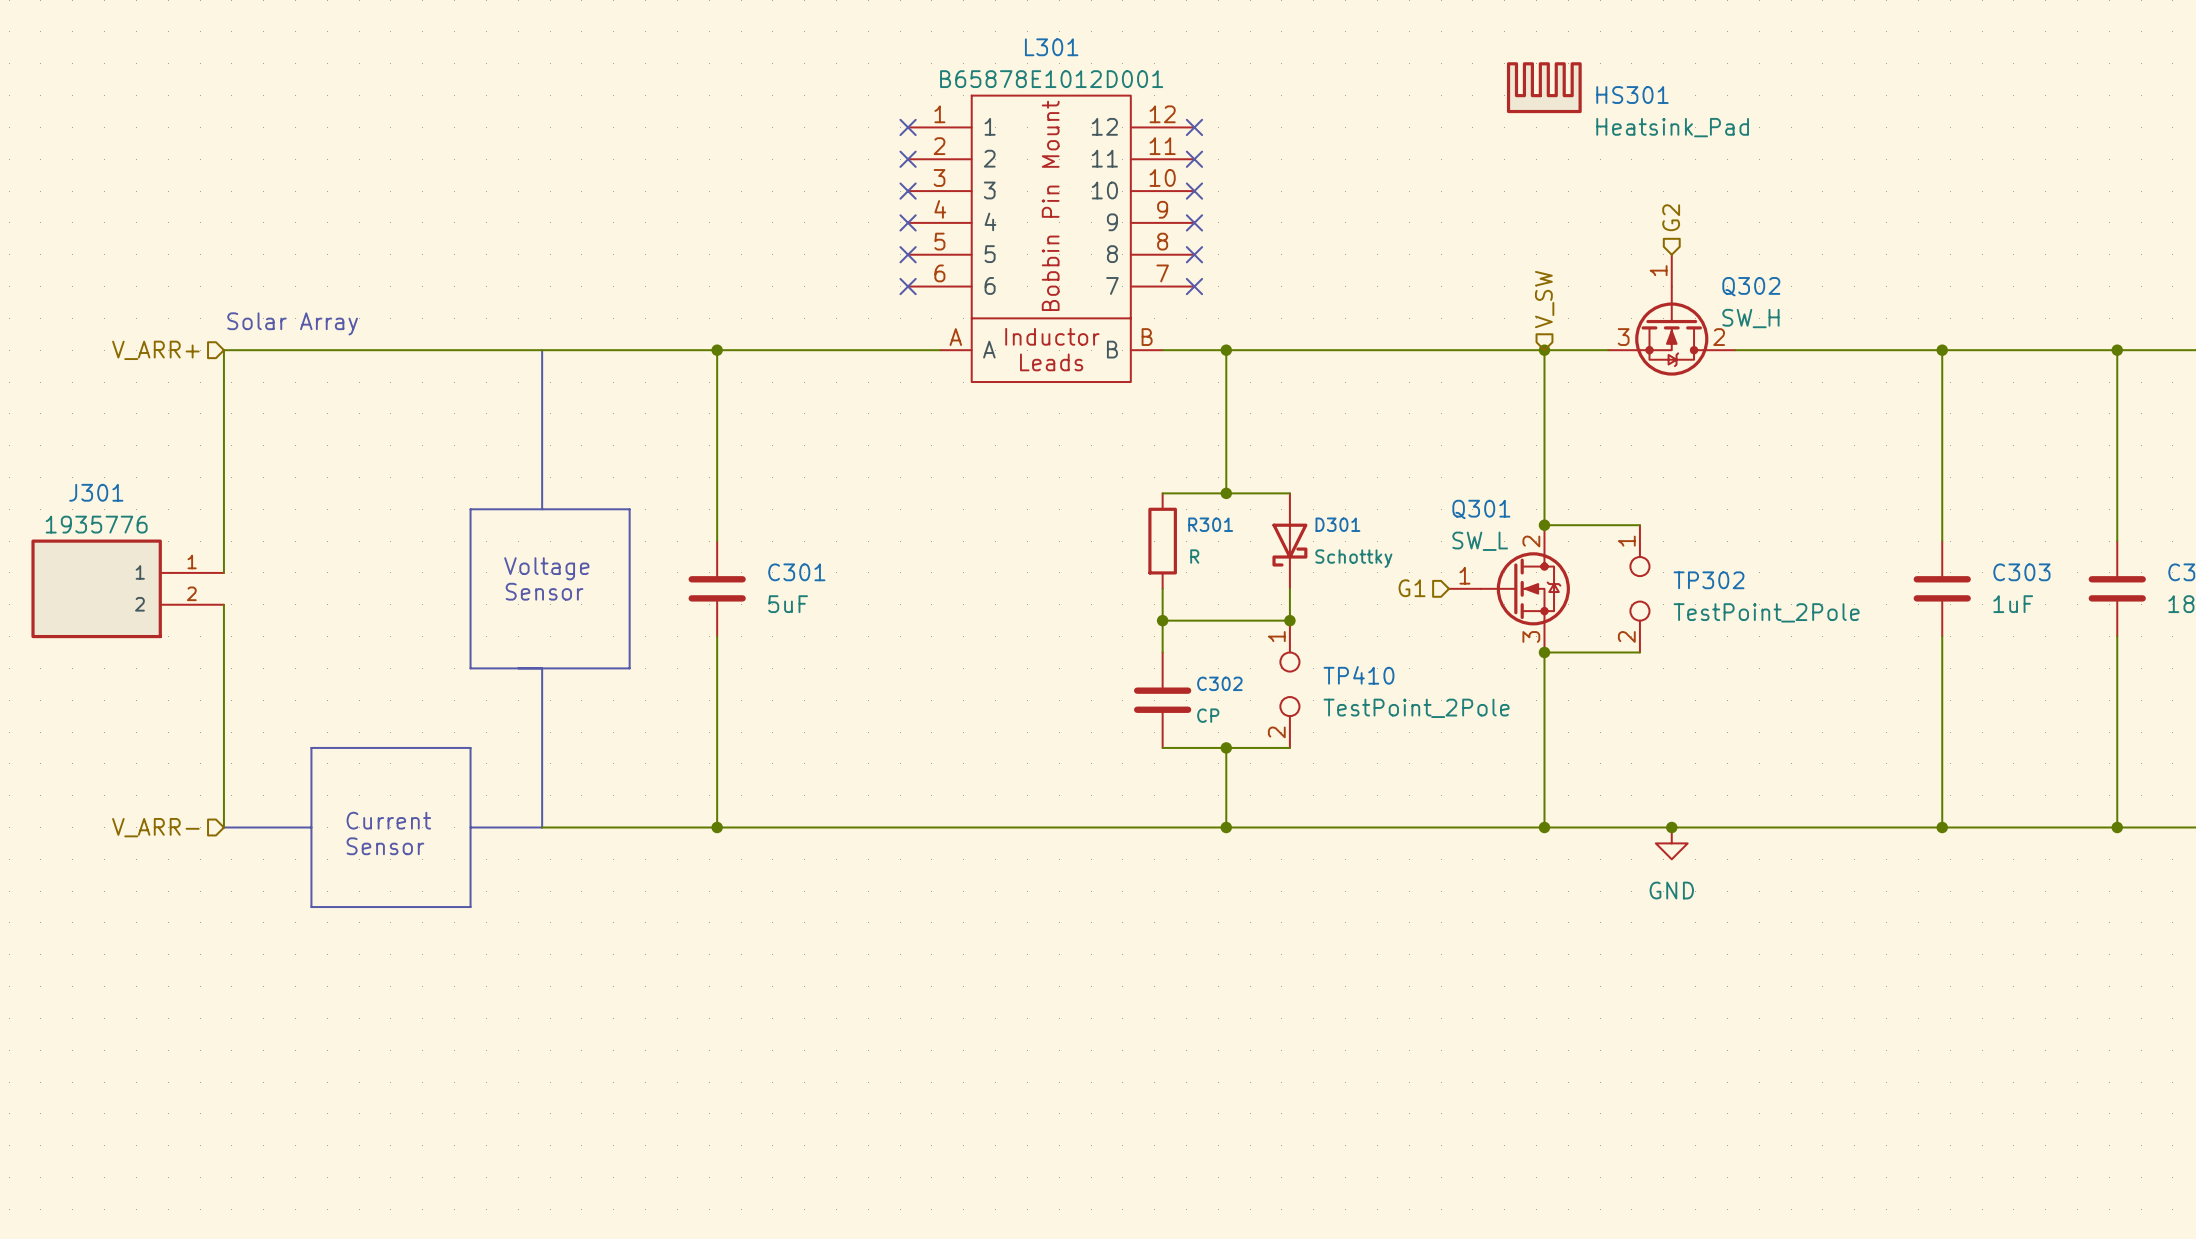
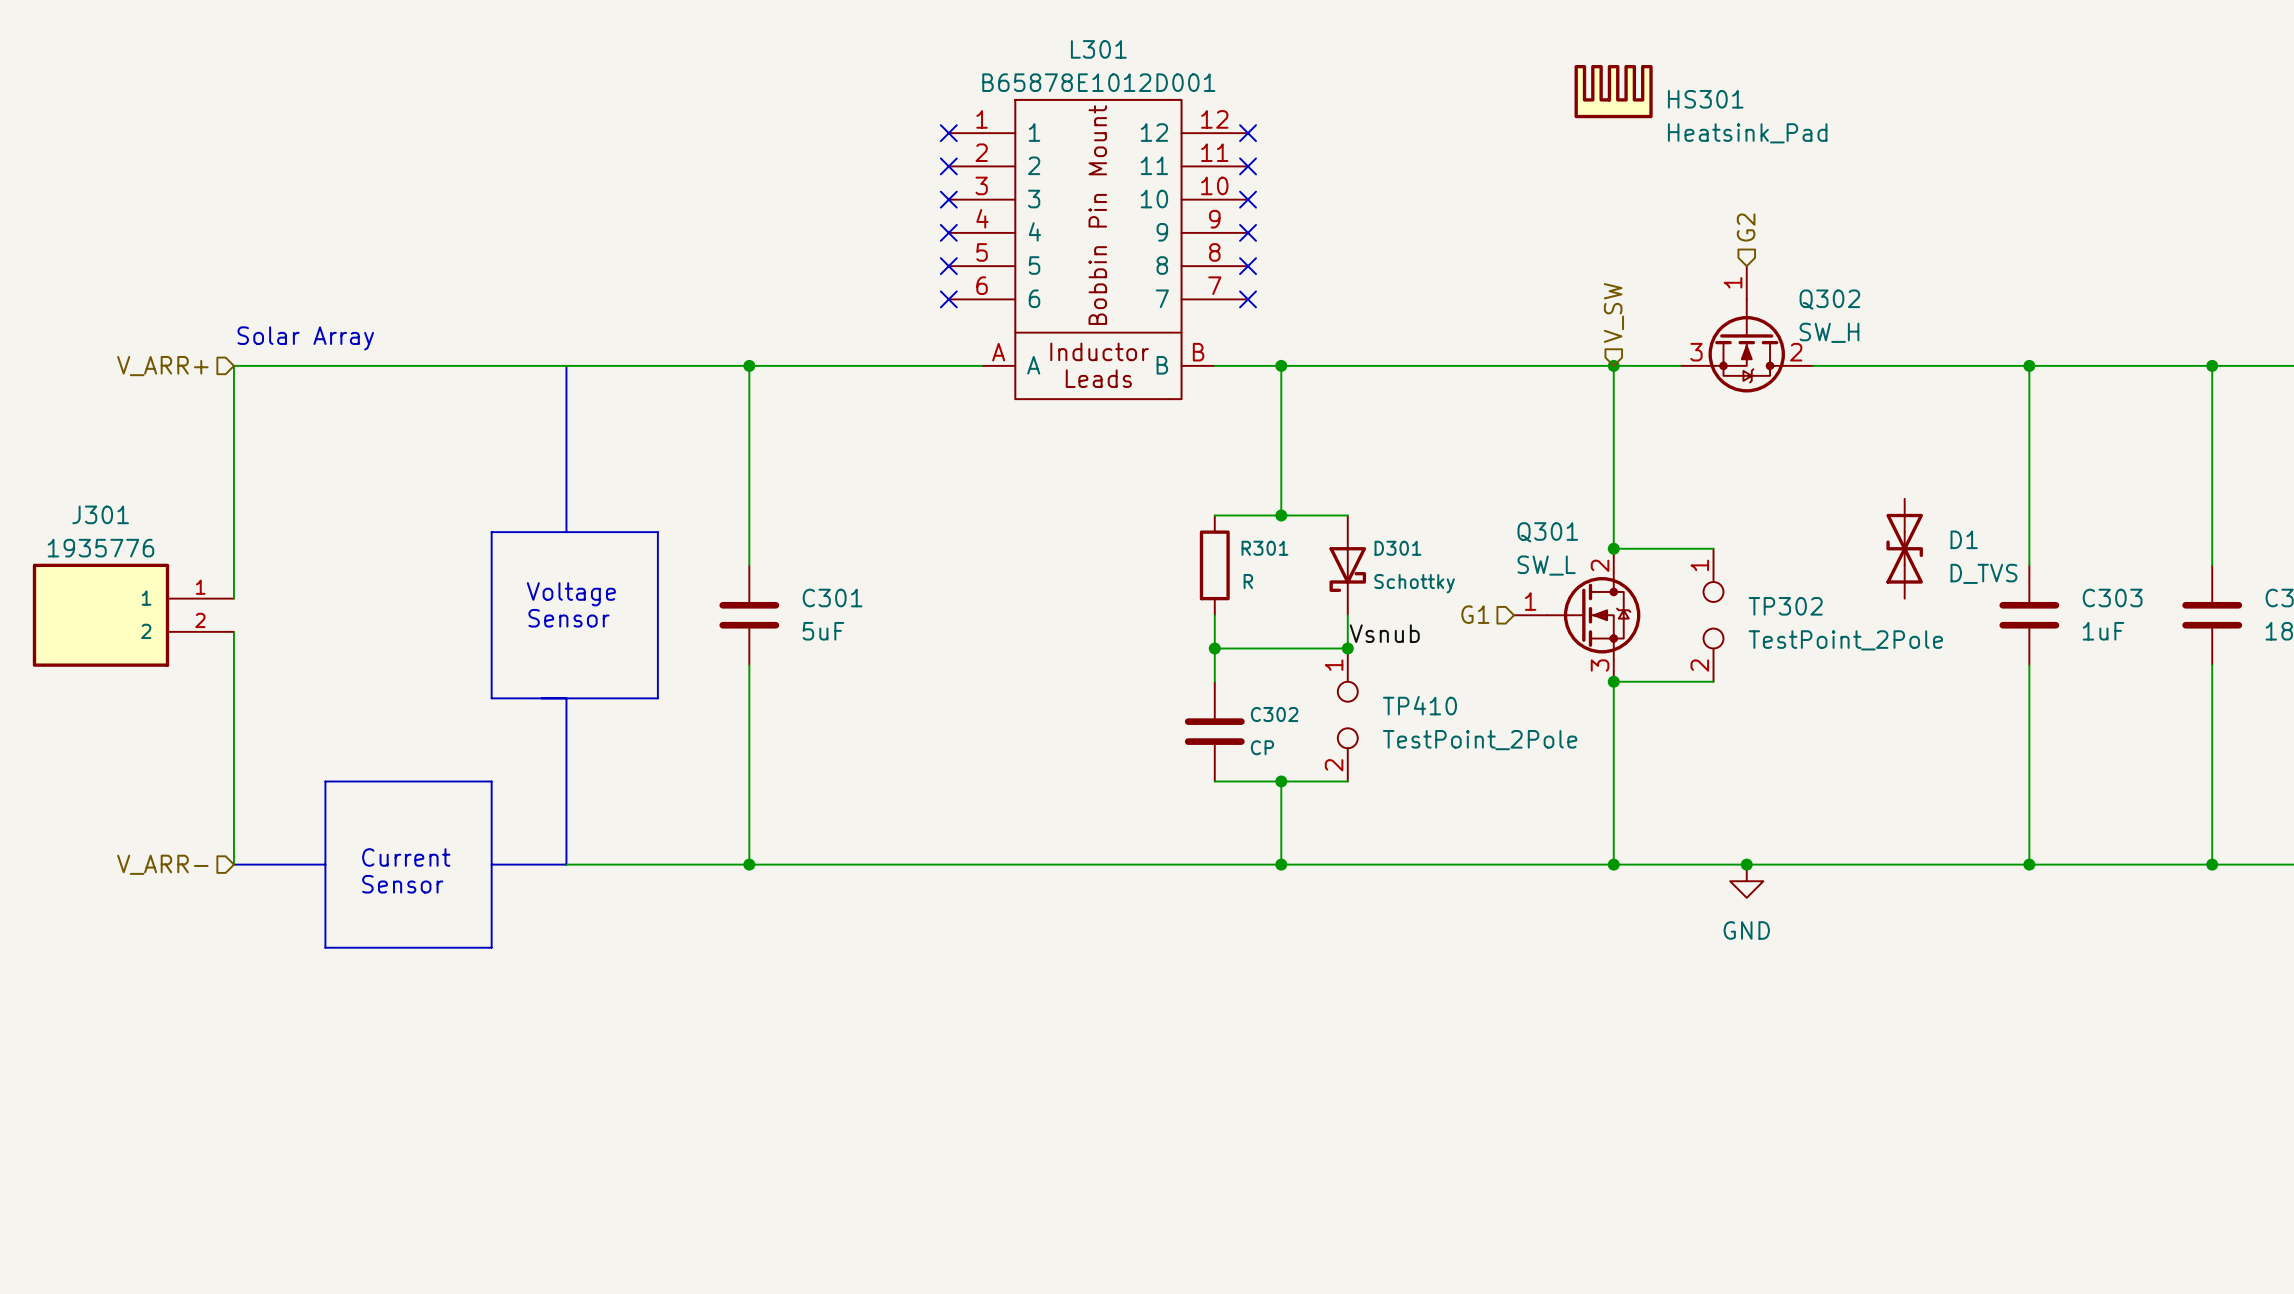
D1: none -> D_TVS (1904, 548)
label: none -> Vsnub (1384, 633)

